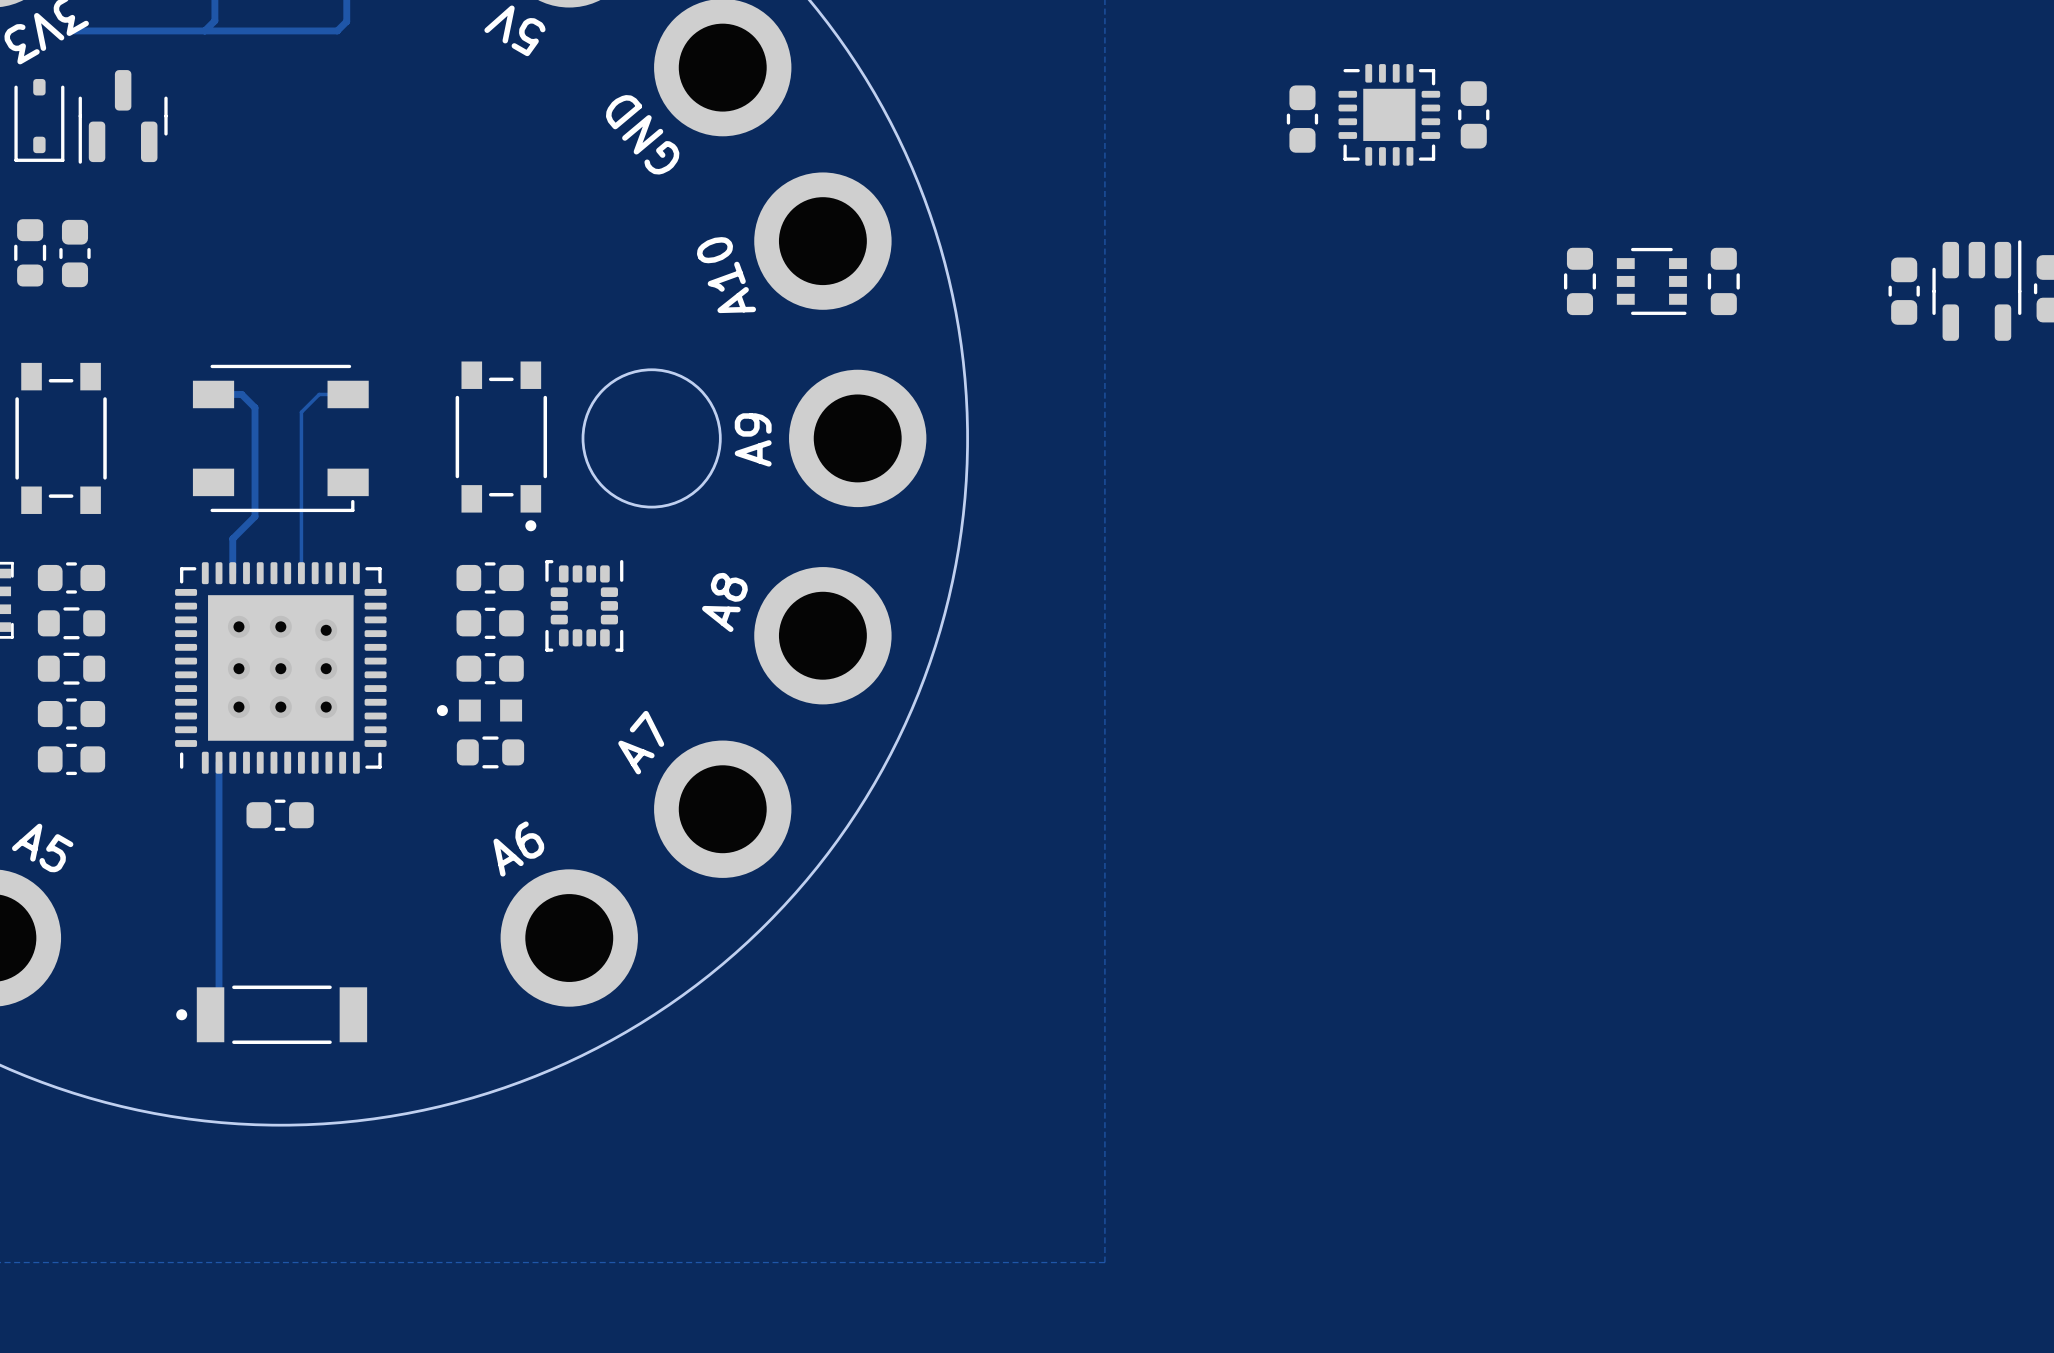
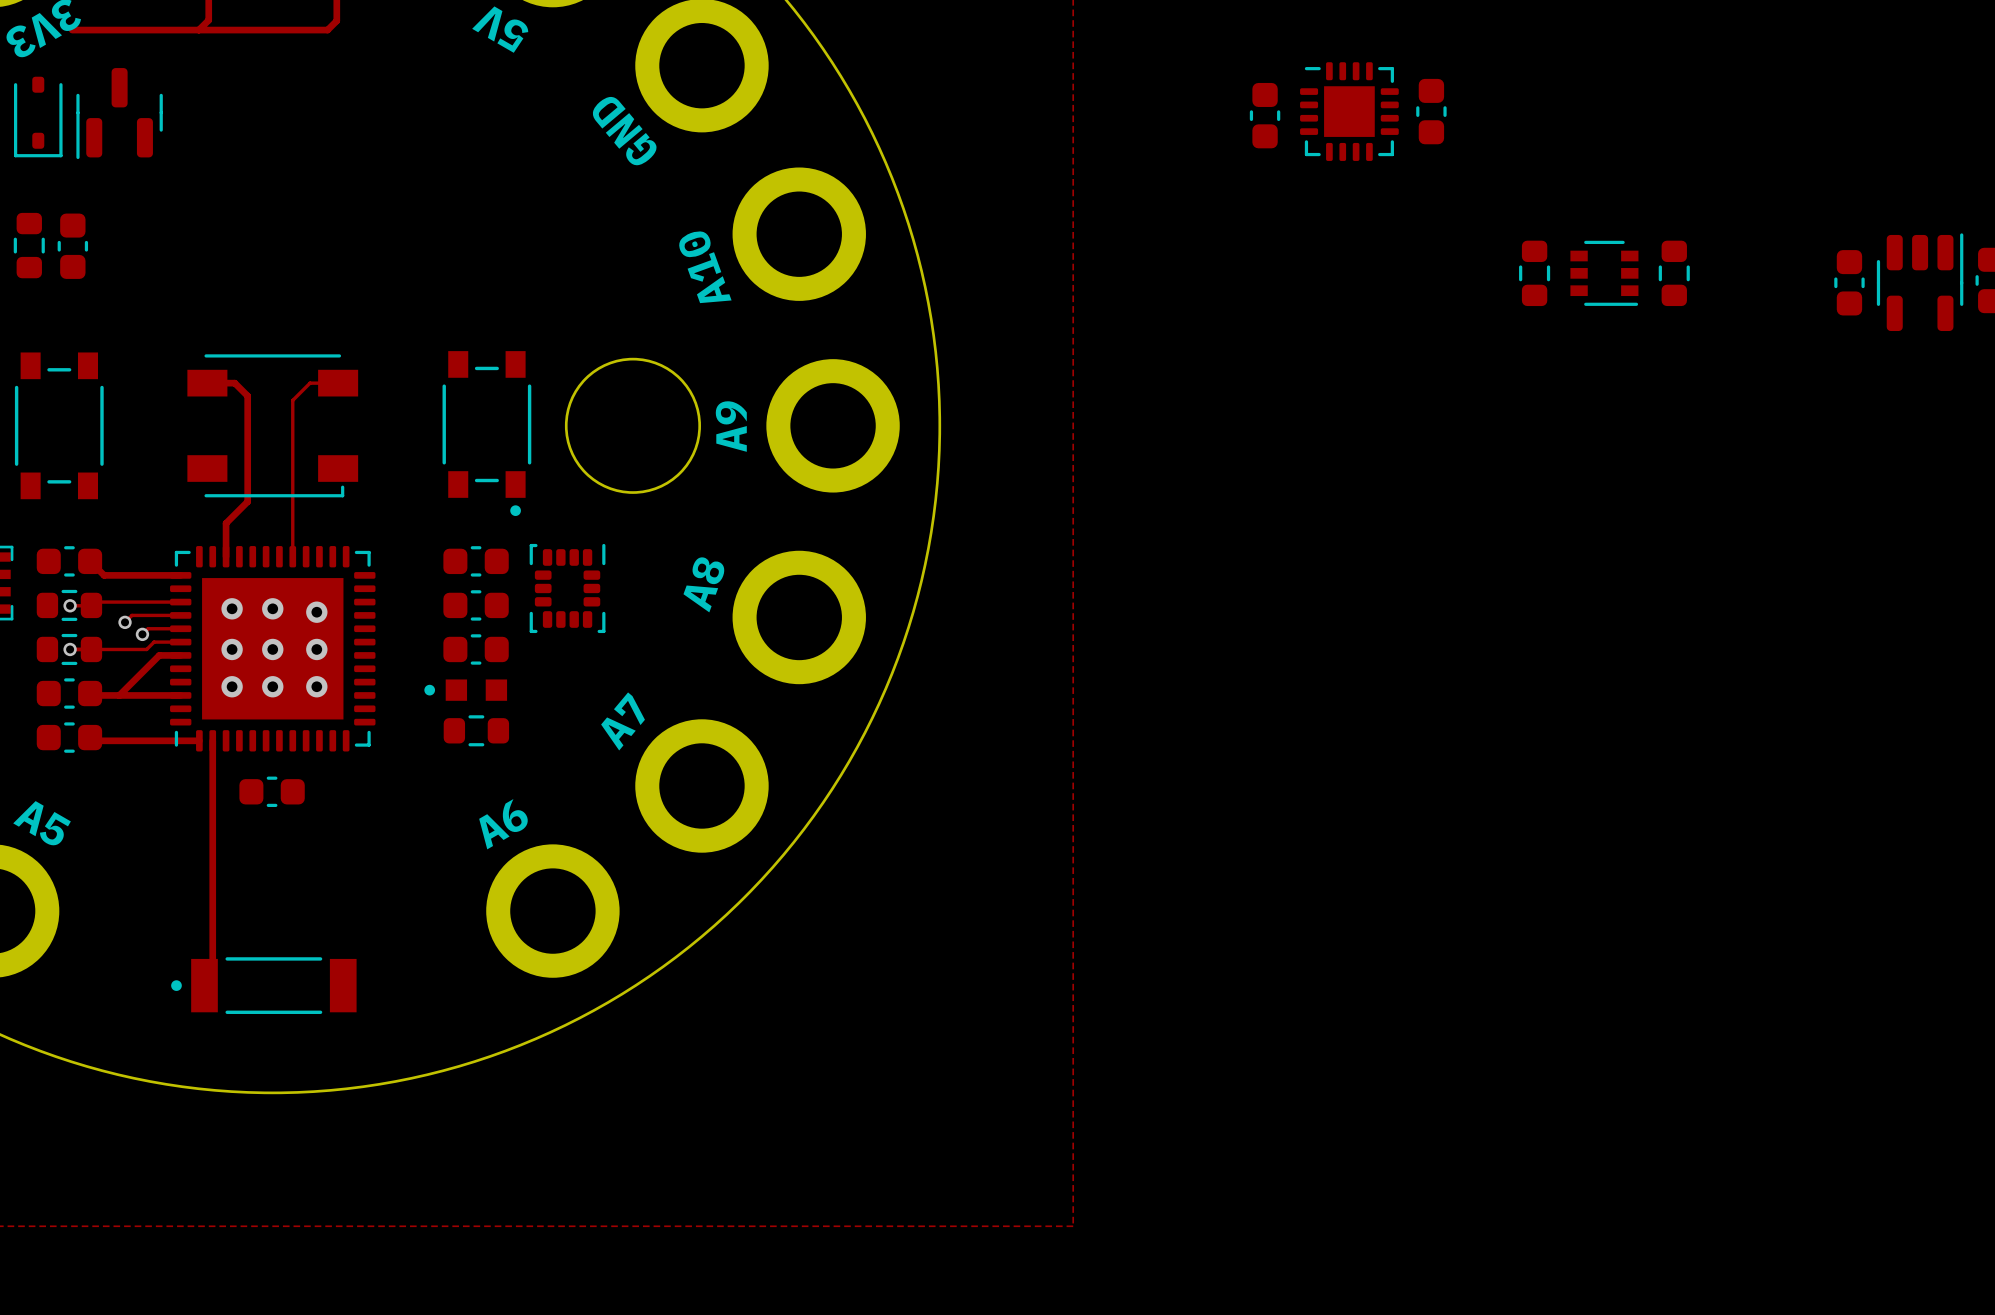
track: none -> (90, 561) (104, 575) (180, 575)
track: none -> (180, 602) (94, 602) (91, 605) (70, 605)
via: none -> (70, 605)
track: none -> (180, 615) (131, 615) (125, 622)
via: none -> (125, 622)
track: none -> (180, 628) (148, 628) (142, 634)
via: none -> (142, 634)
track: none -> (180, 642) (154, 642) (146, 649) (70, 649)
via: none -> (70, 649)
track: none -> (180, 655) (159, 655) (119, 695)
track: none -> (90, 693) (92, 695) (180, 695)
track: none -> (90, 737) (93, 740) (199, 740)

